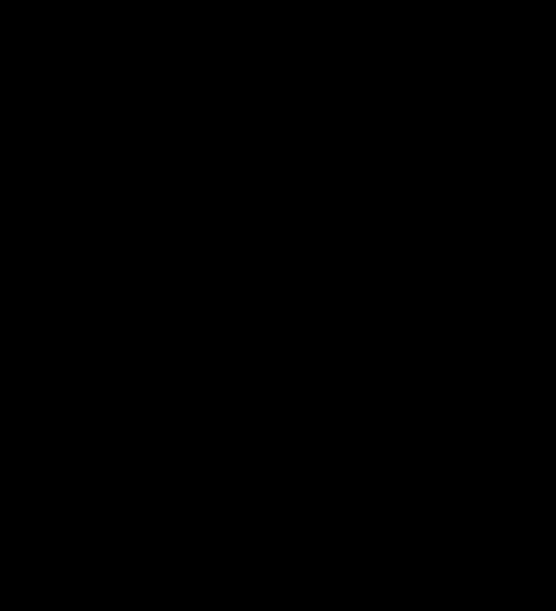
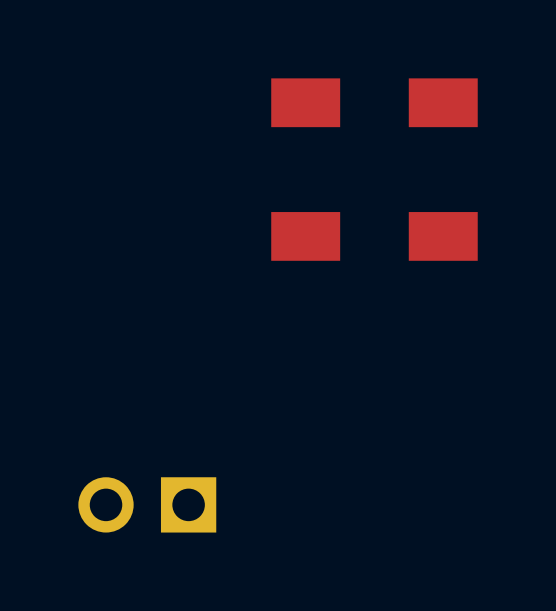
part: none -> (374, 102)
part: none -> (374, 236)
part: none -> (147, 504)

